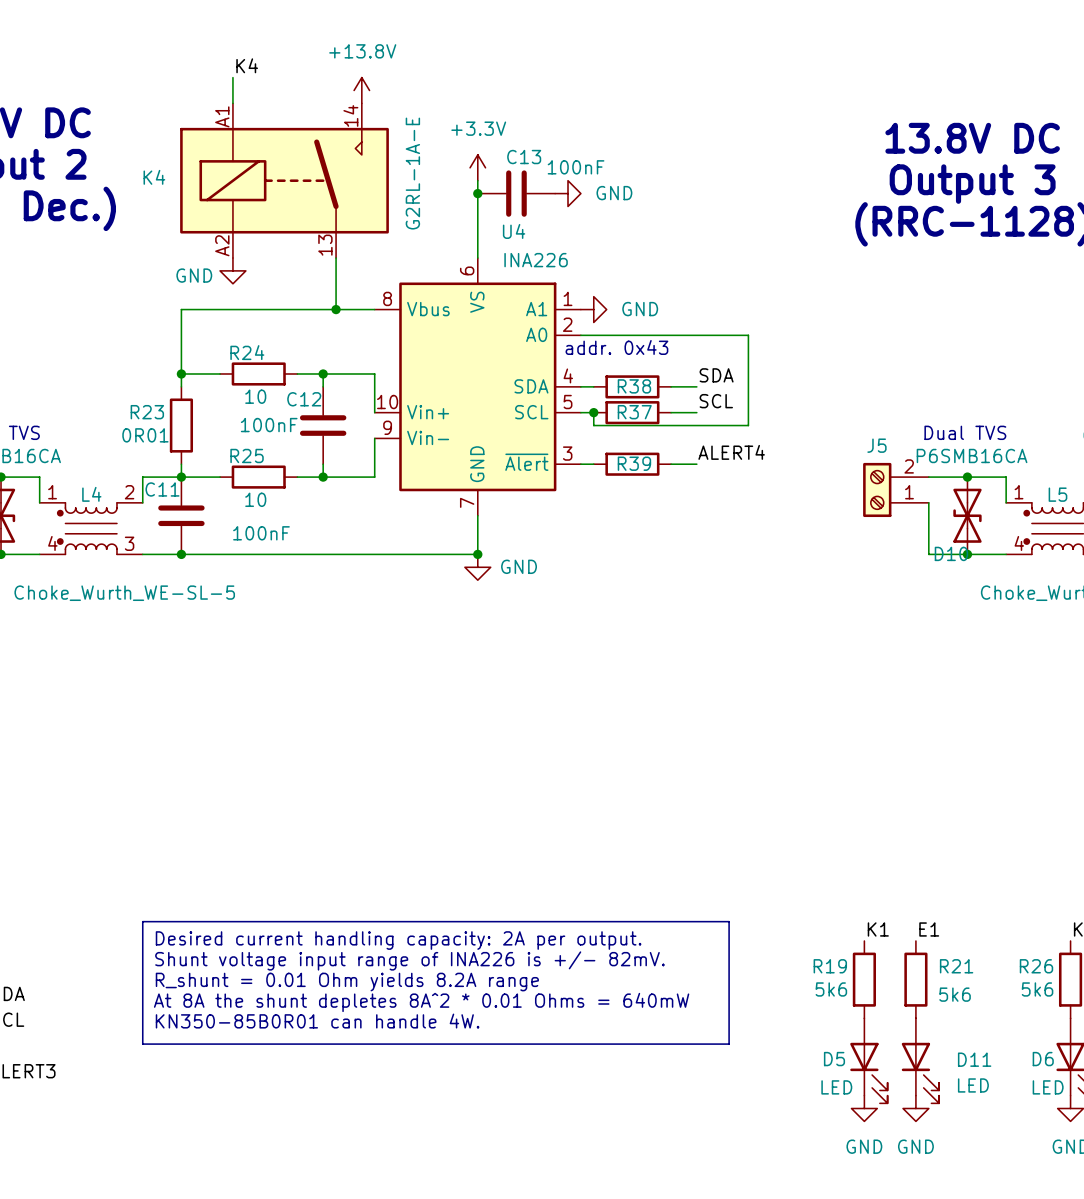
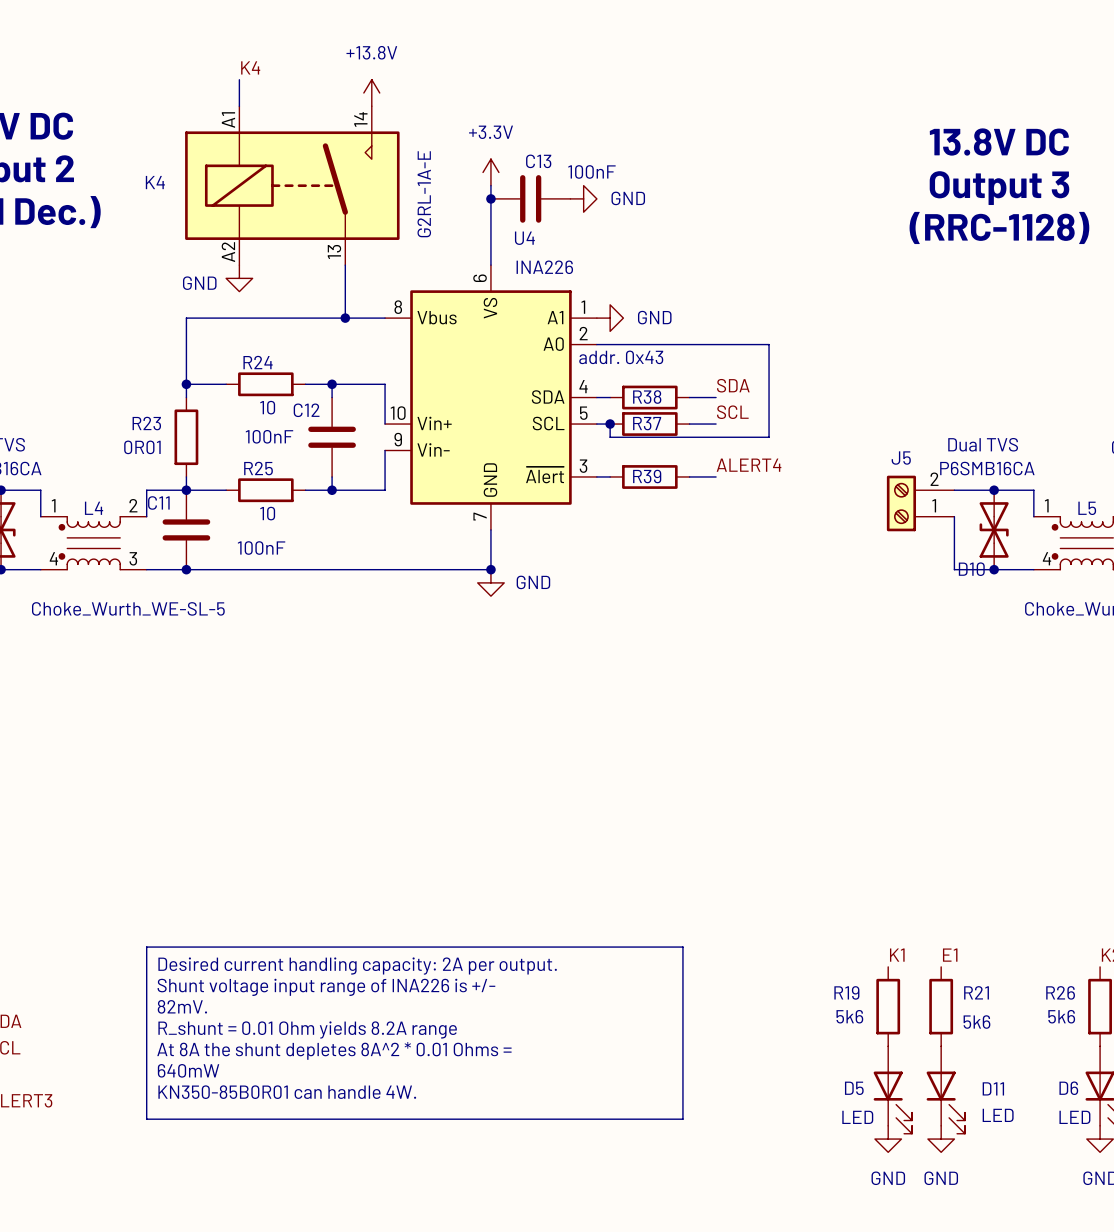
line: (664, 921) (729, 921) (729, 1044) (142, 1044) -> (682, 947) (682, 1119) (146, 1119) (146, 1072)
text: Shunt voltage input range of INA226 is +/- 82mV. (409, 960) -> Shunt voltage input range of INA226 is +/- (326, 987)
text: R_shunt = 0.01 Ohm yields 8.2A range (347, 982) -> 82mV. (182, 1006)
text: At 8A the shunt depletes 8A^2 * 0.01 Ohms = 640mW (421, 1002) -> R_shunt = 0.01 Ohm yields 8.2A range (307, 1029)
text: KN350-85B0R01 can handle 4W. (317, 1021) -> At 8A the shunt depletes 8A^2 * 0.01 Ohms = (334, 1050)
text: none -> 640mW (188, 1070)
text: none -> KN350-85B0R01 can handle 4W. (287, 1092)

